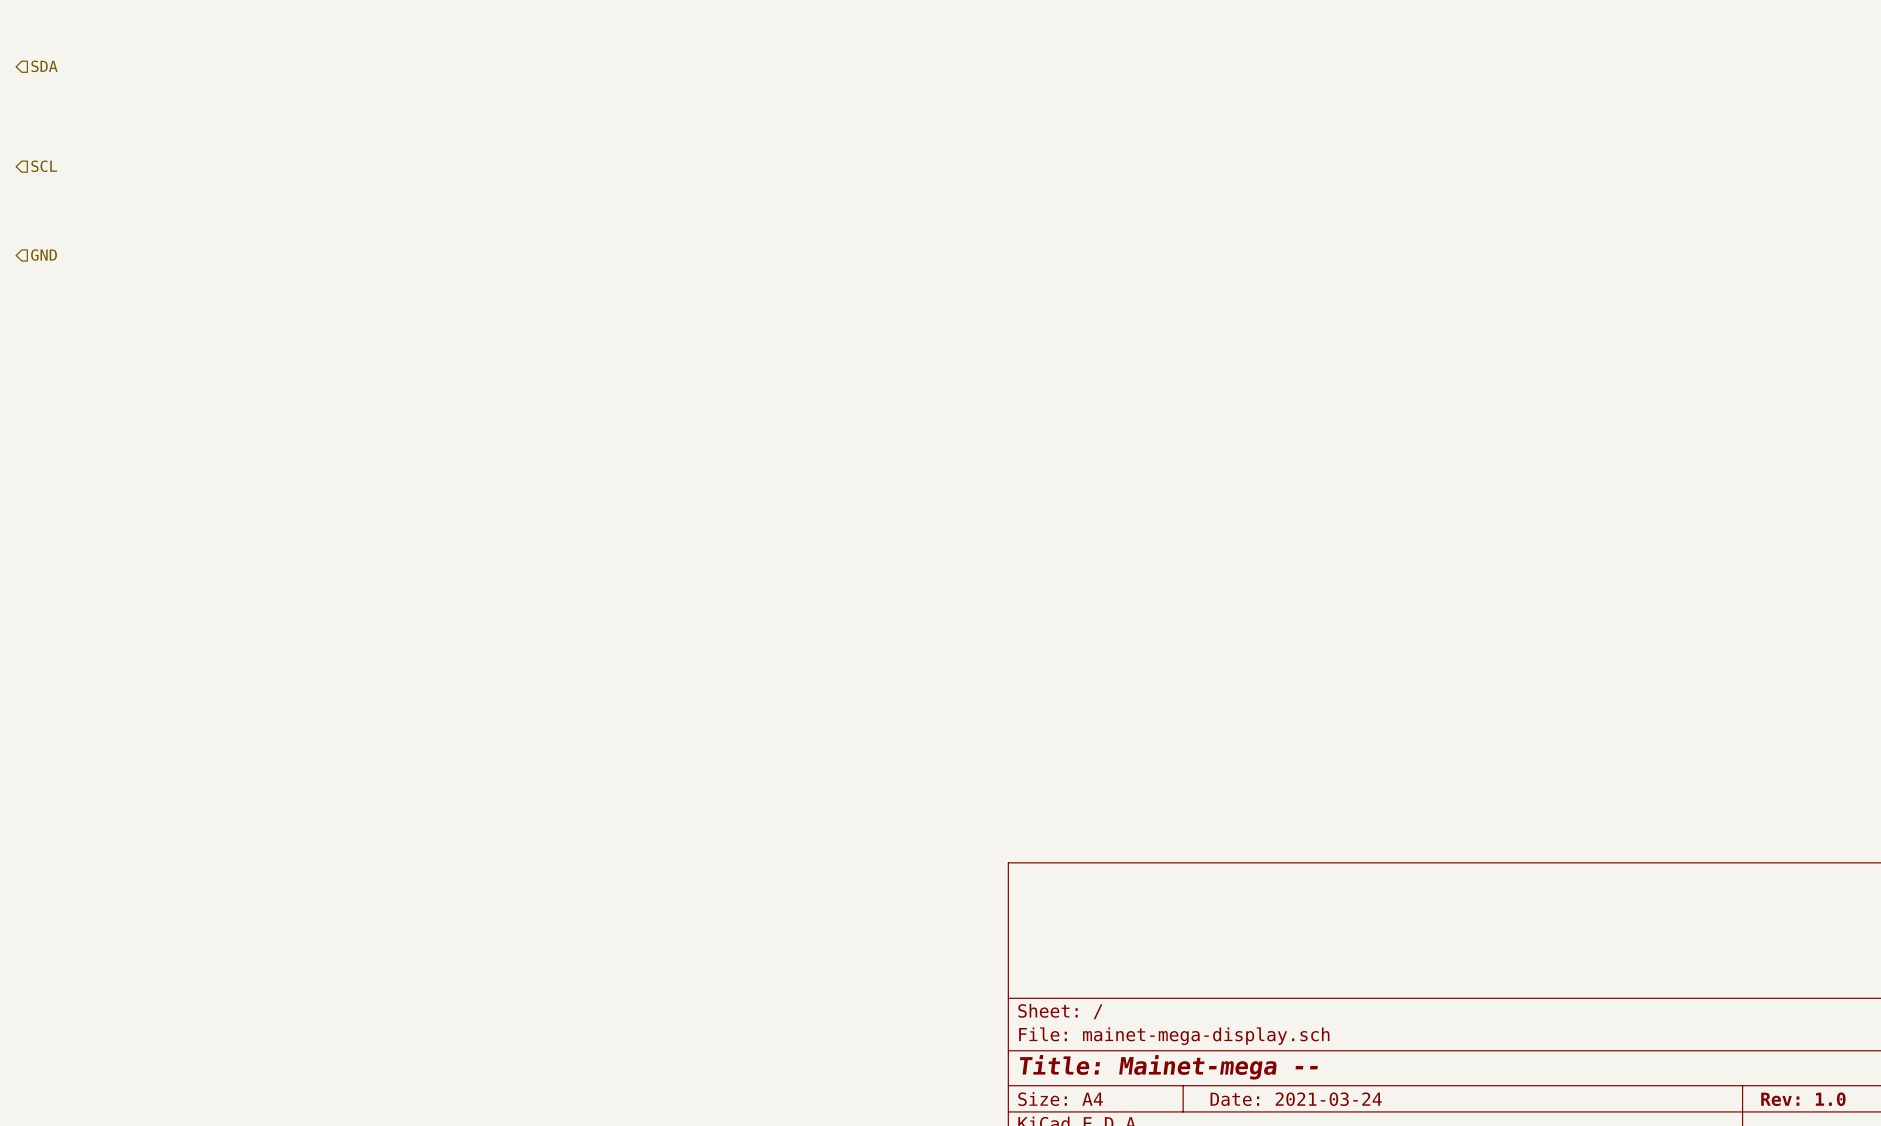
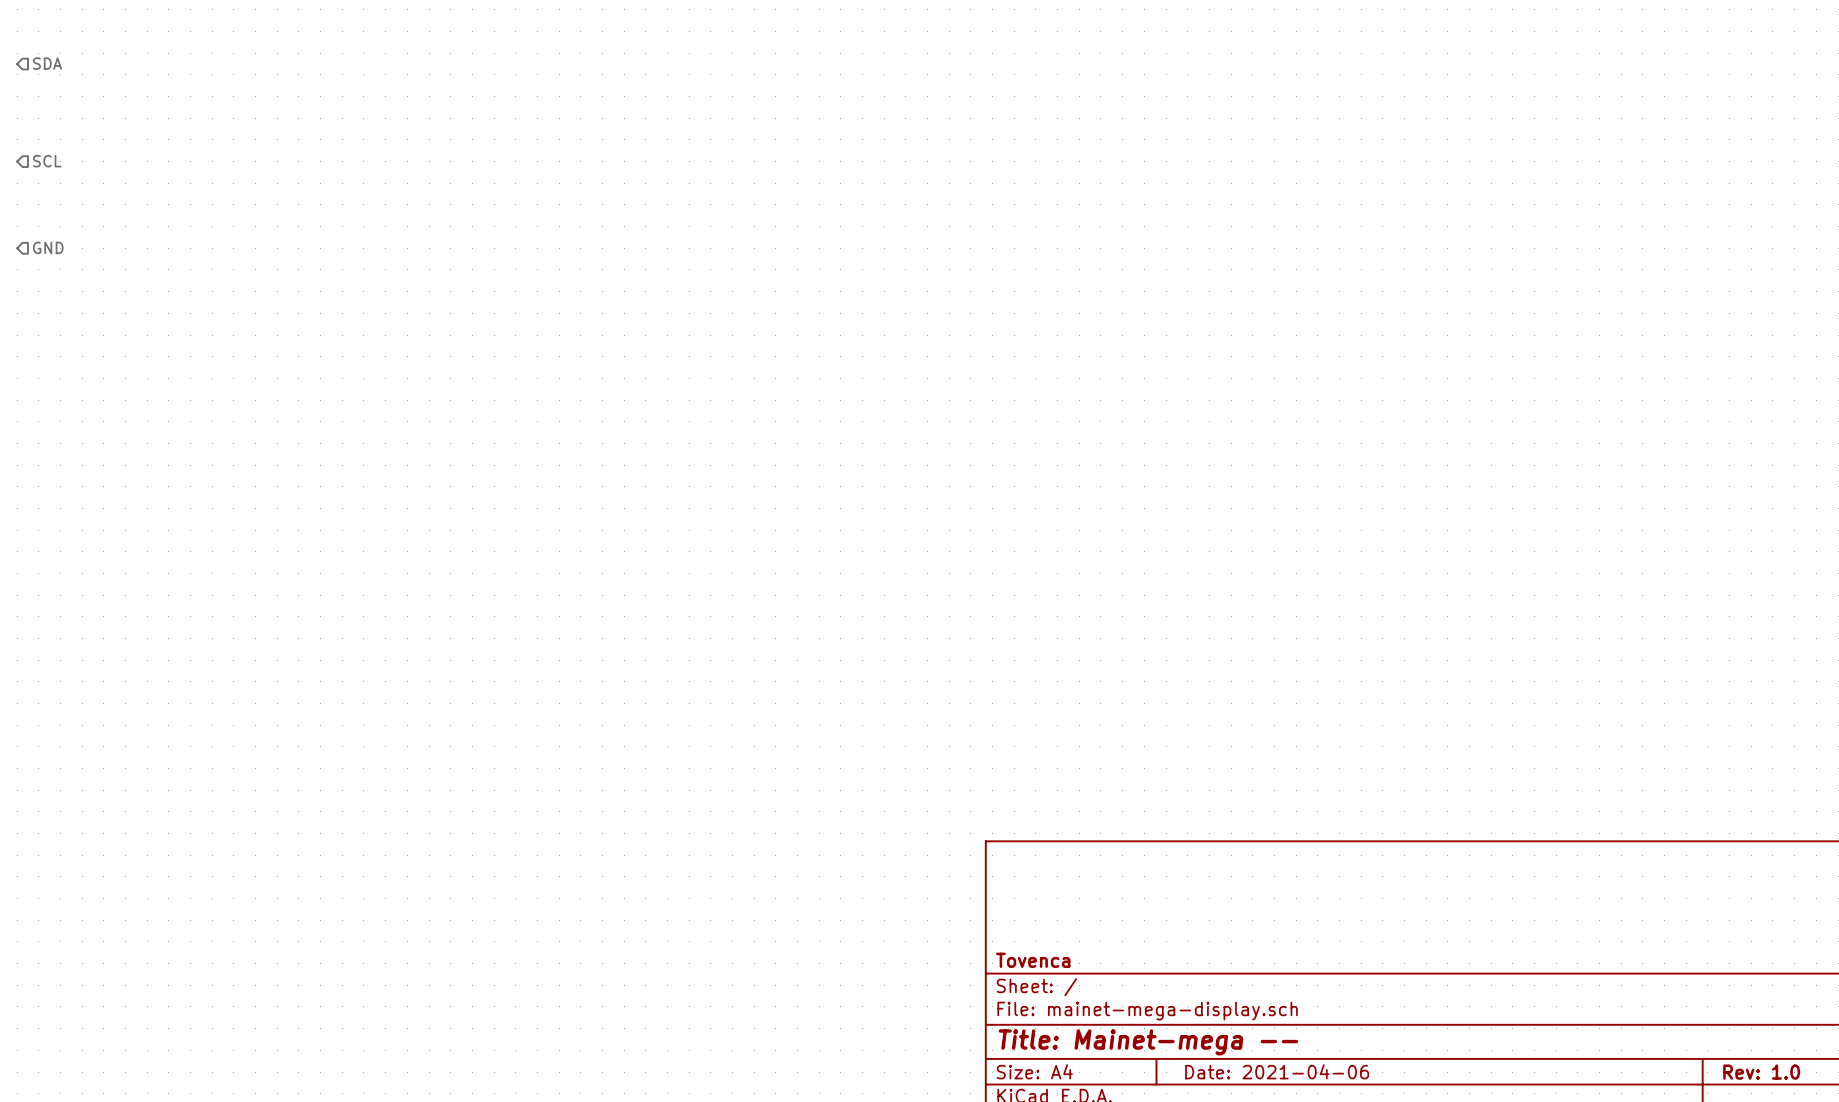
title block: none -> Tovenca (1033, 960)
title block: Date: 2021-03-24 (1296, 1099) -> Date: 2021-04-06 (1277, 1071)

